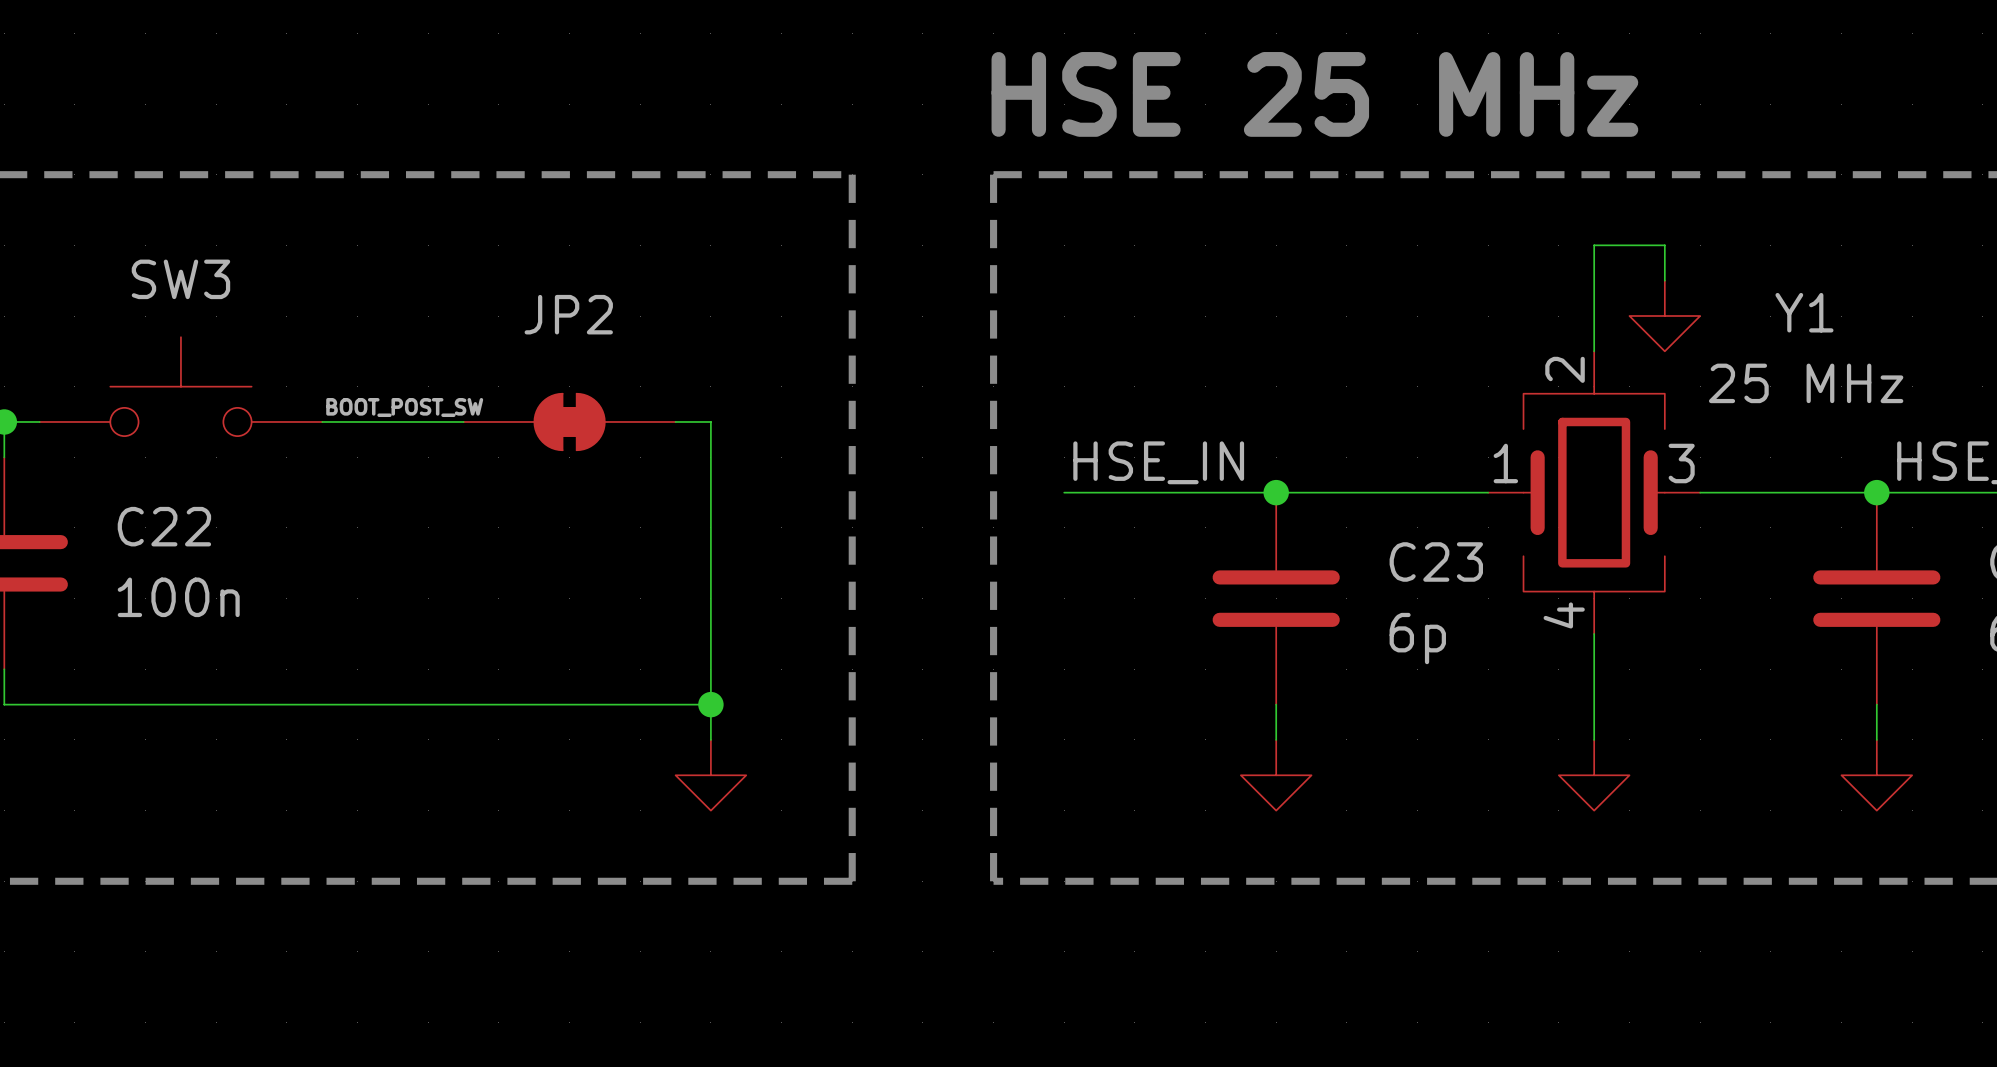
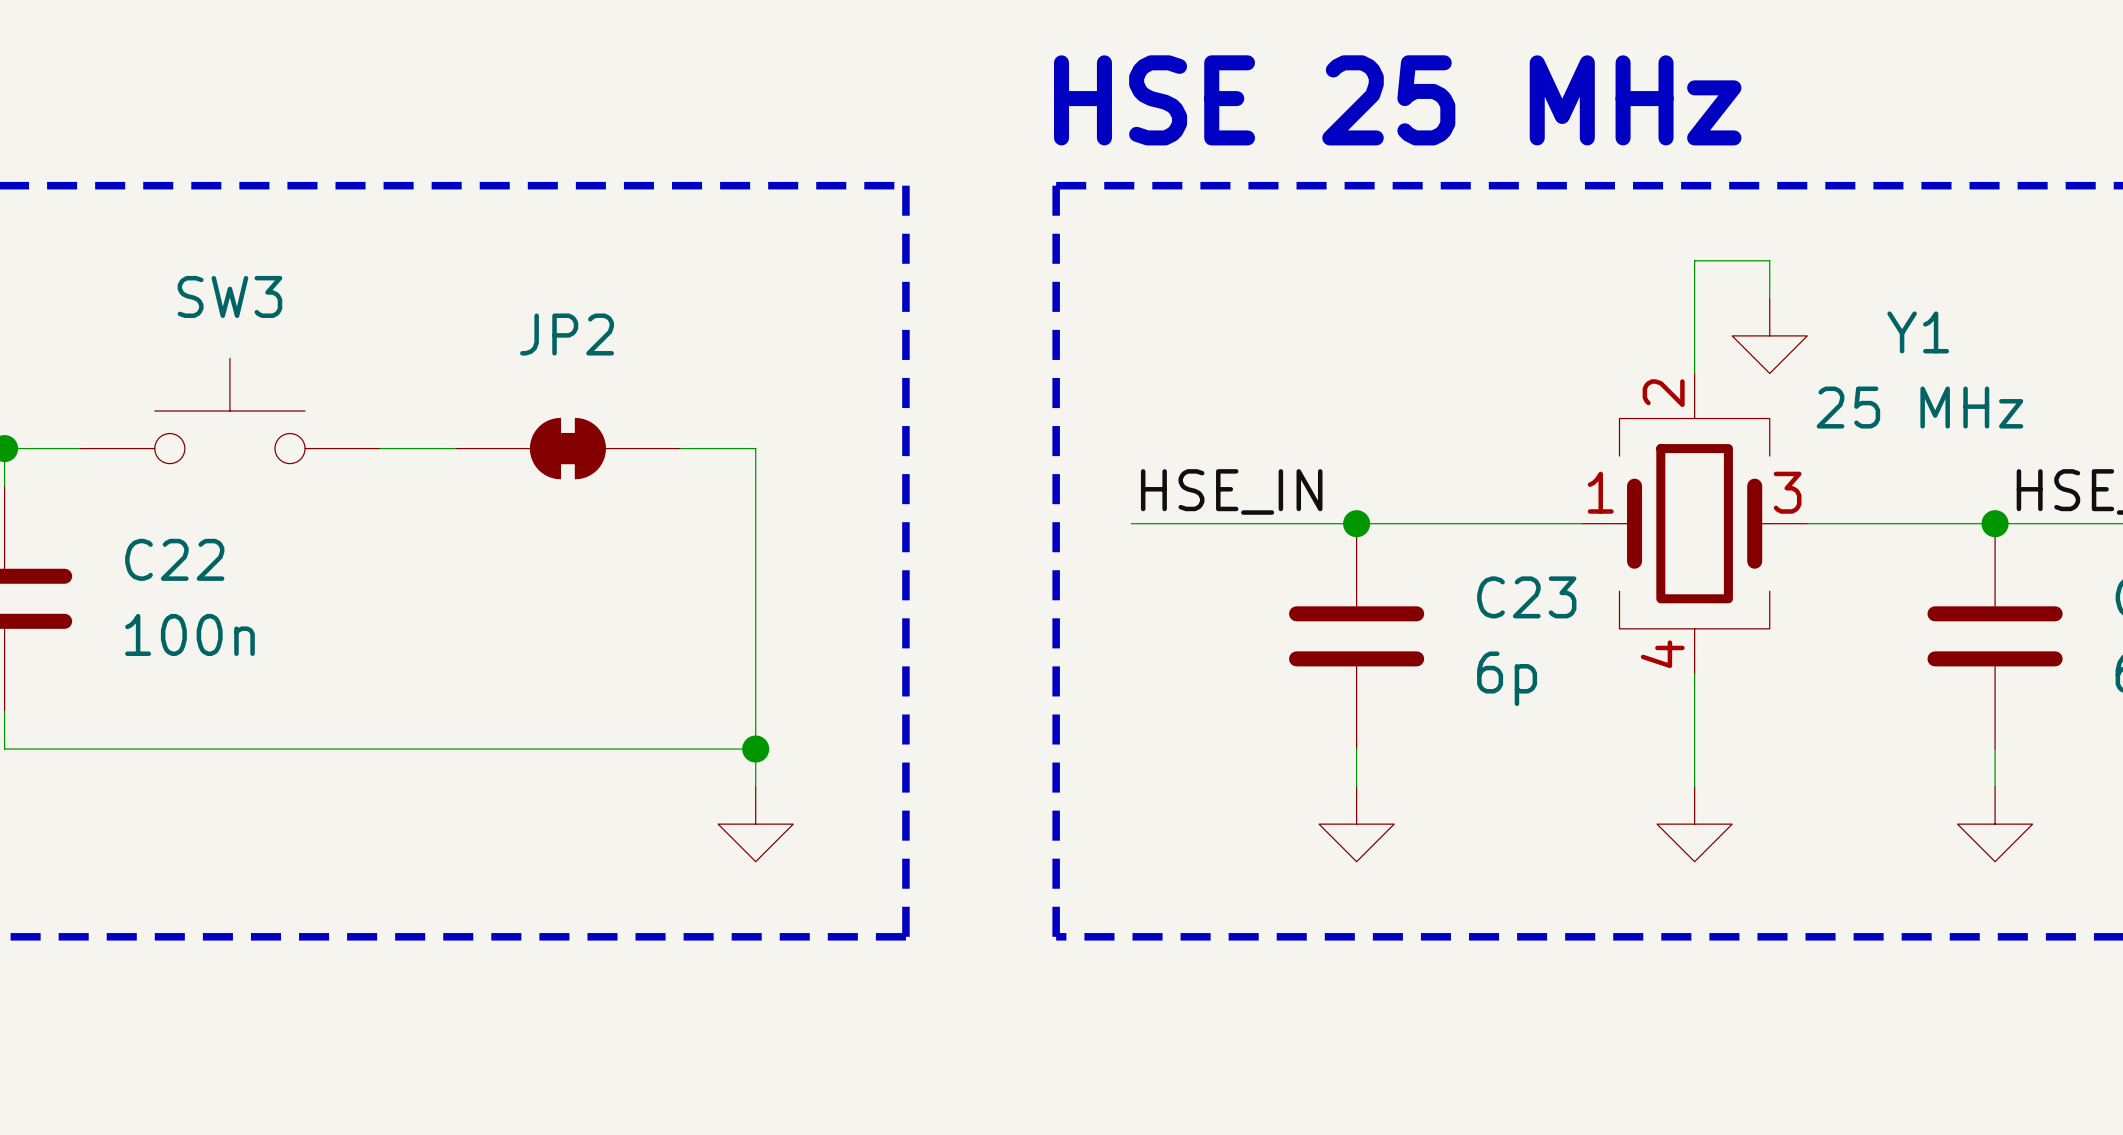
SW3 position: (180, 386) -> (229, 411)
label: BOOT_POST_SW (404, 407) -> none
JP2 position: (569, 421) -> (567, 448)

